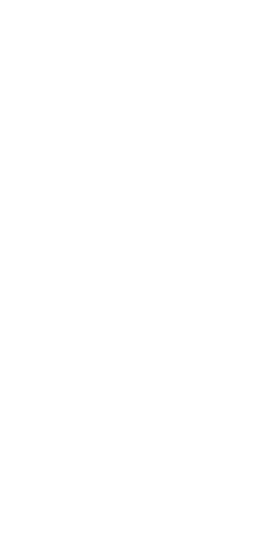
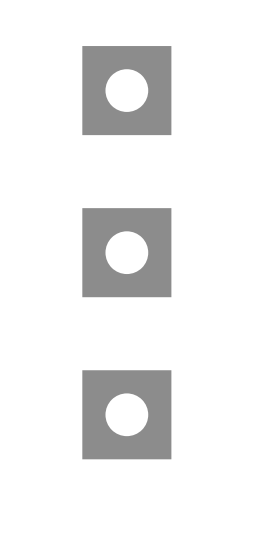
part: none -> (126, 90)
part: none -> (126, 252)
part: none -> (126, 414)

